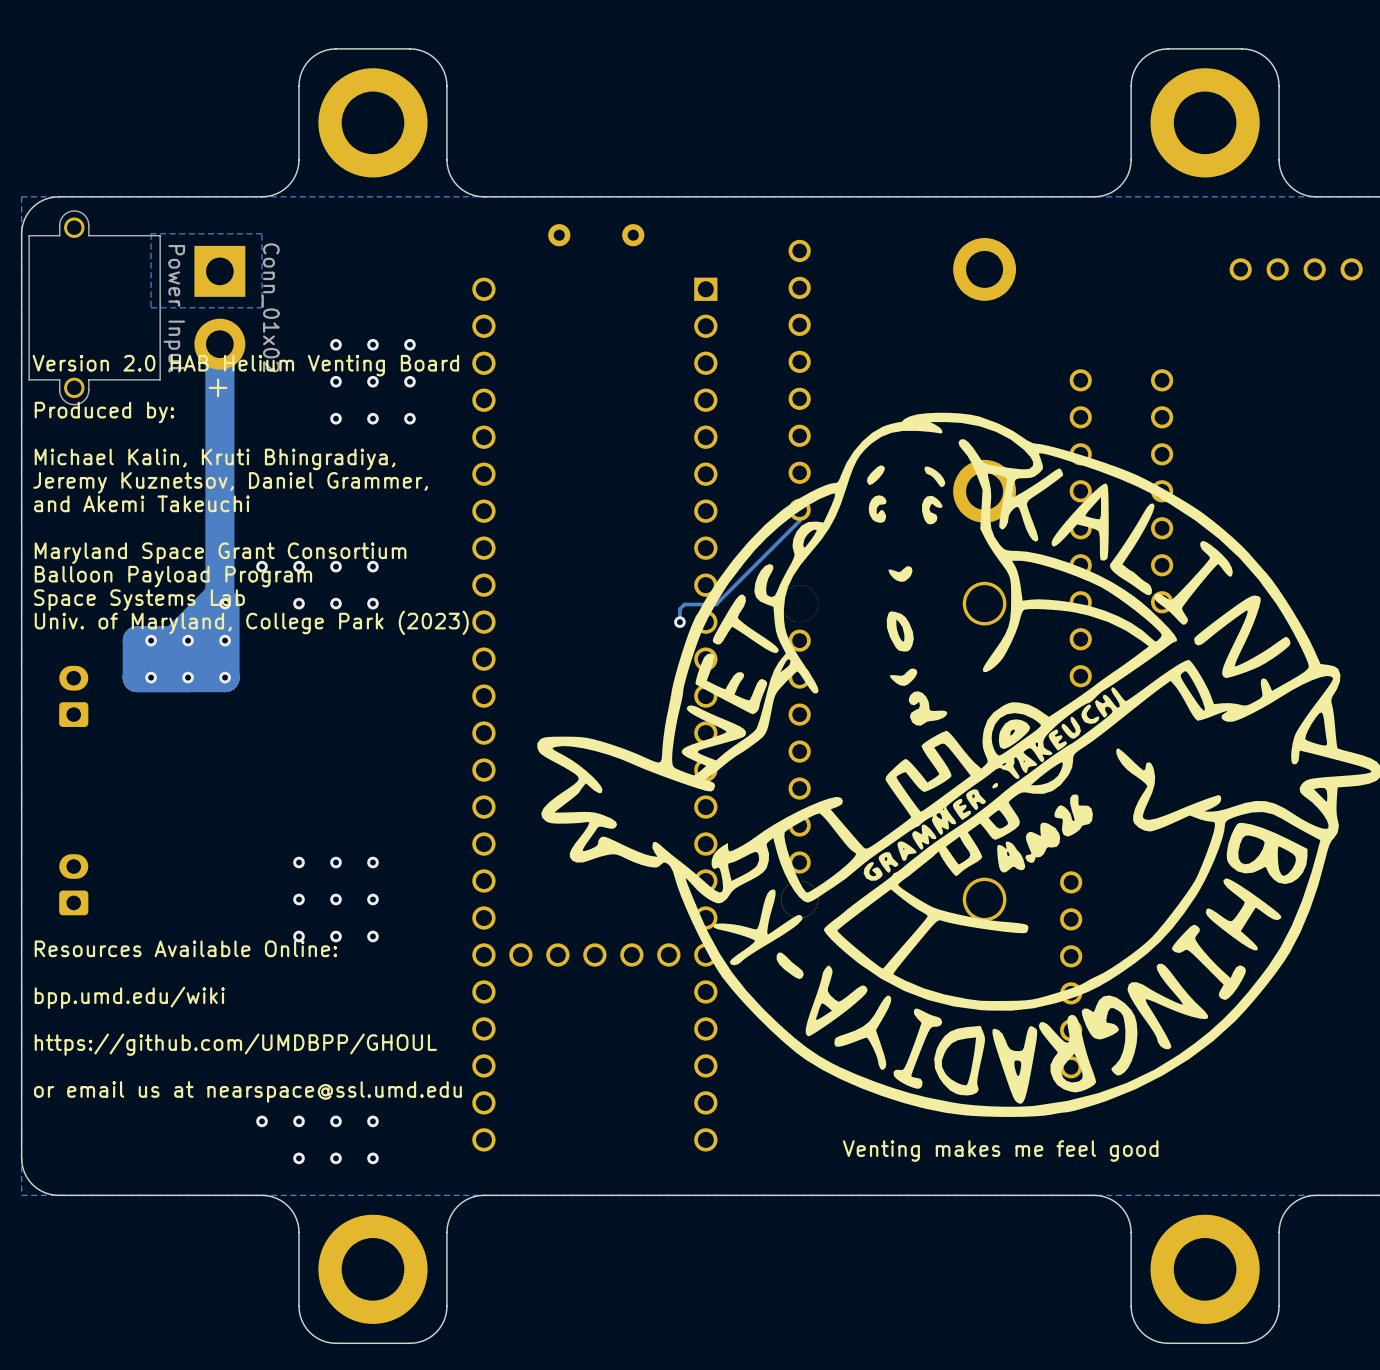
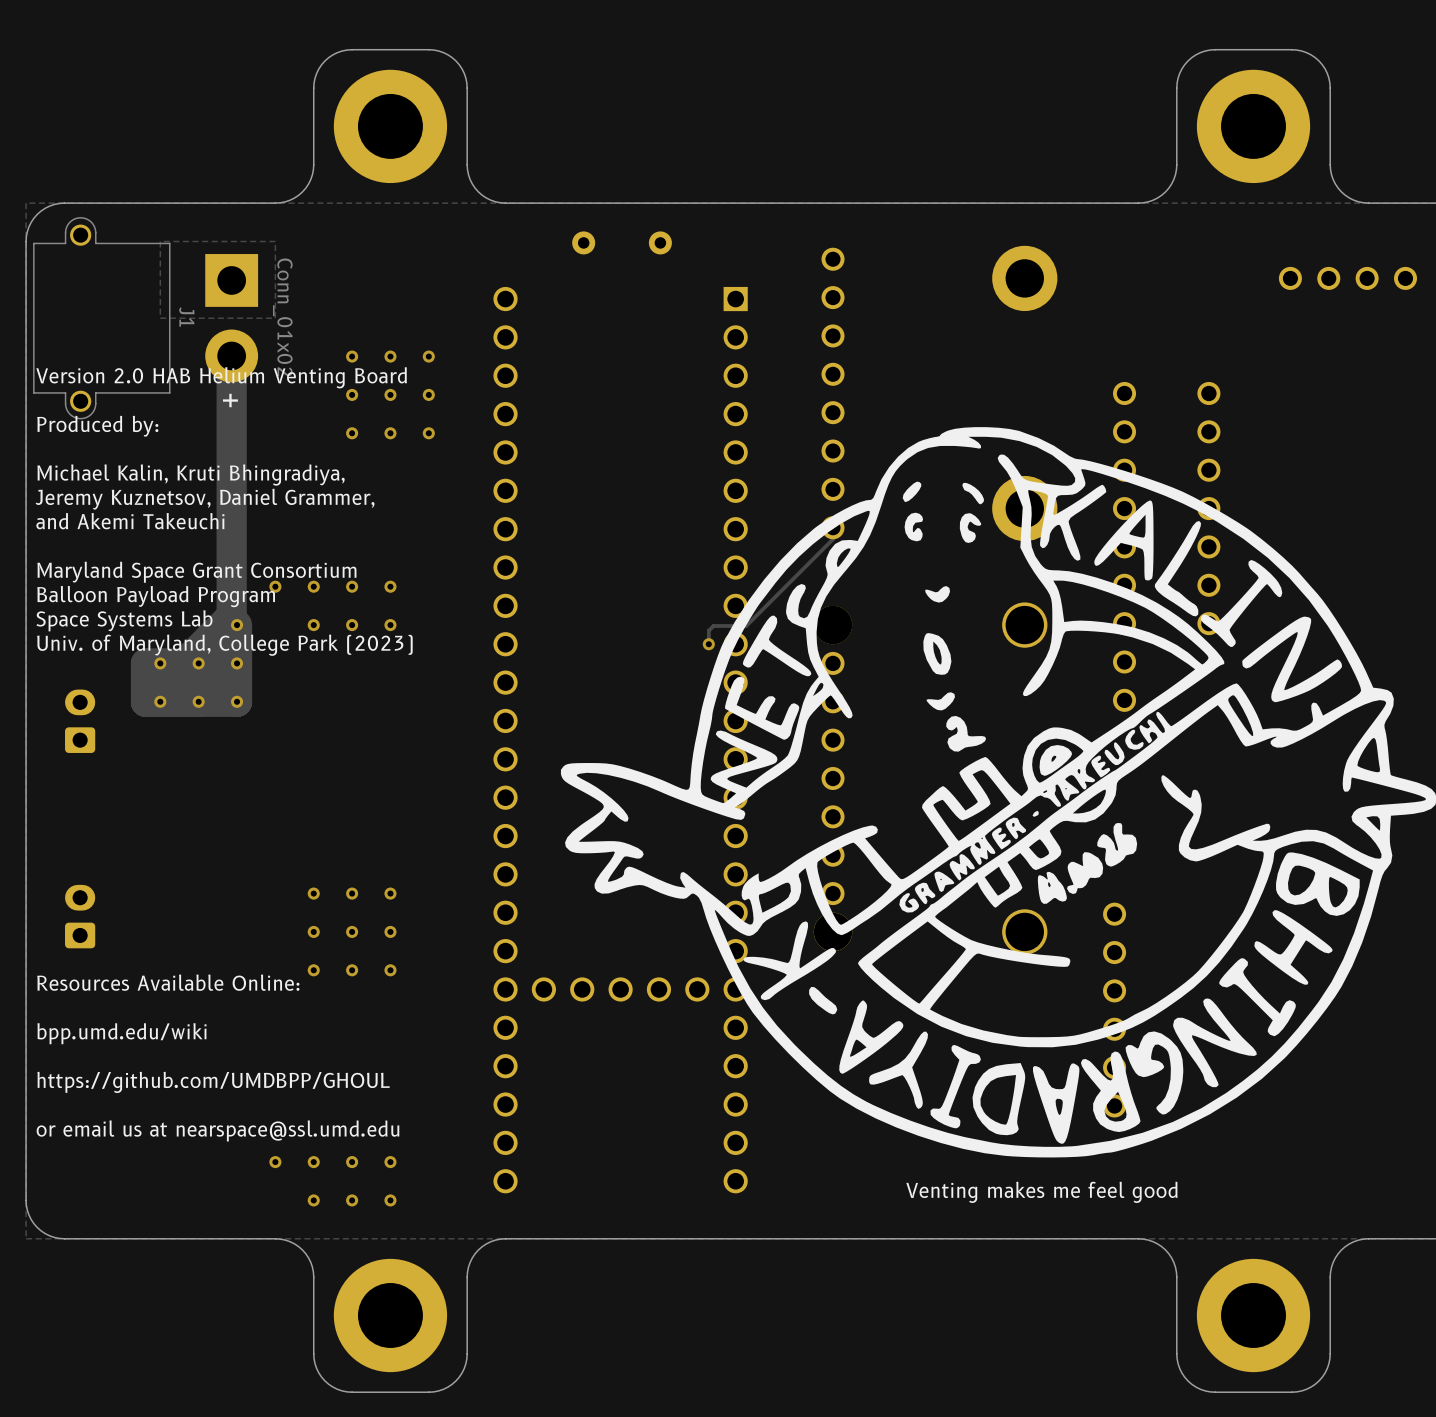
Power Input name: Power Input (174, 308) -> J1 (186, 316)

